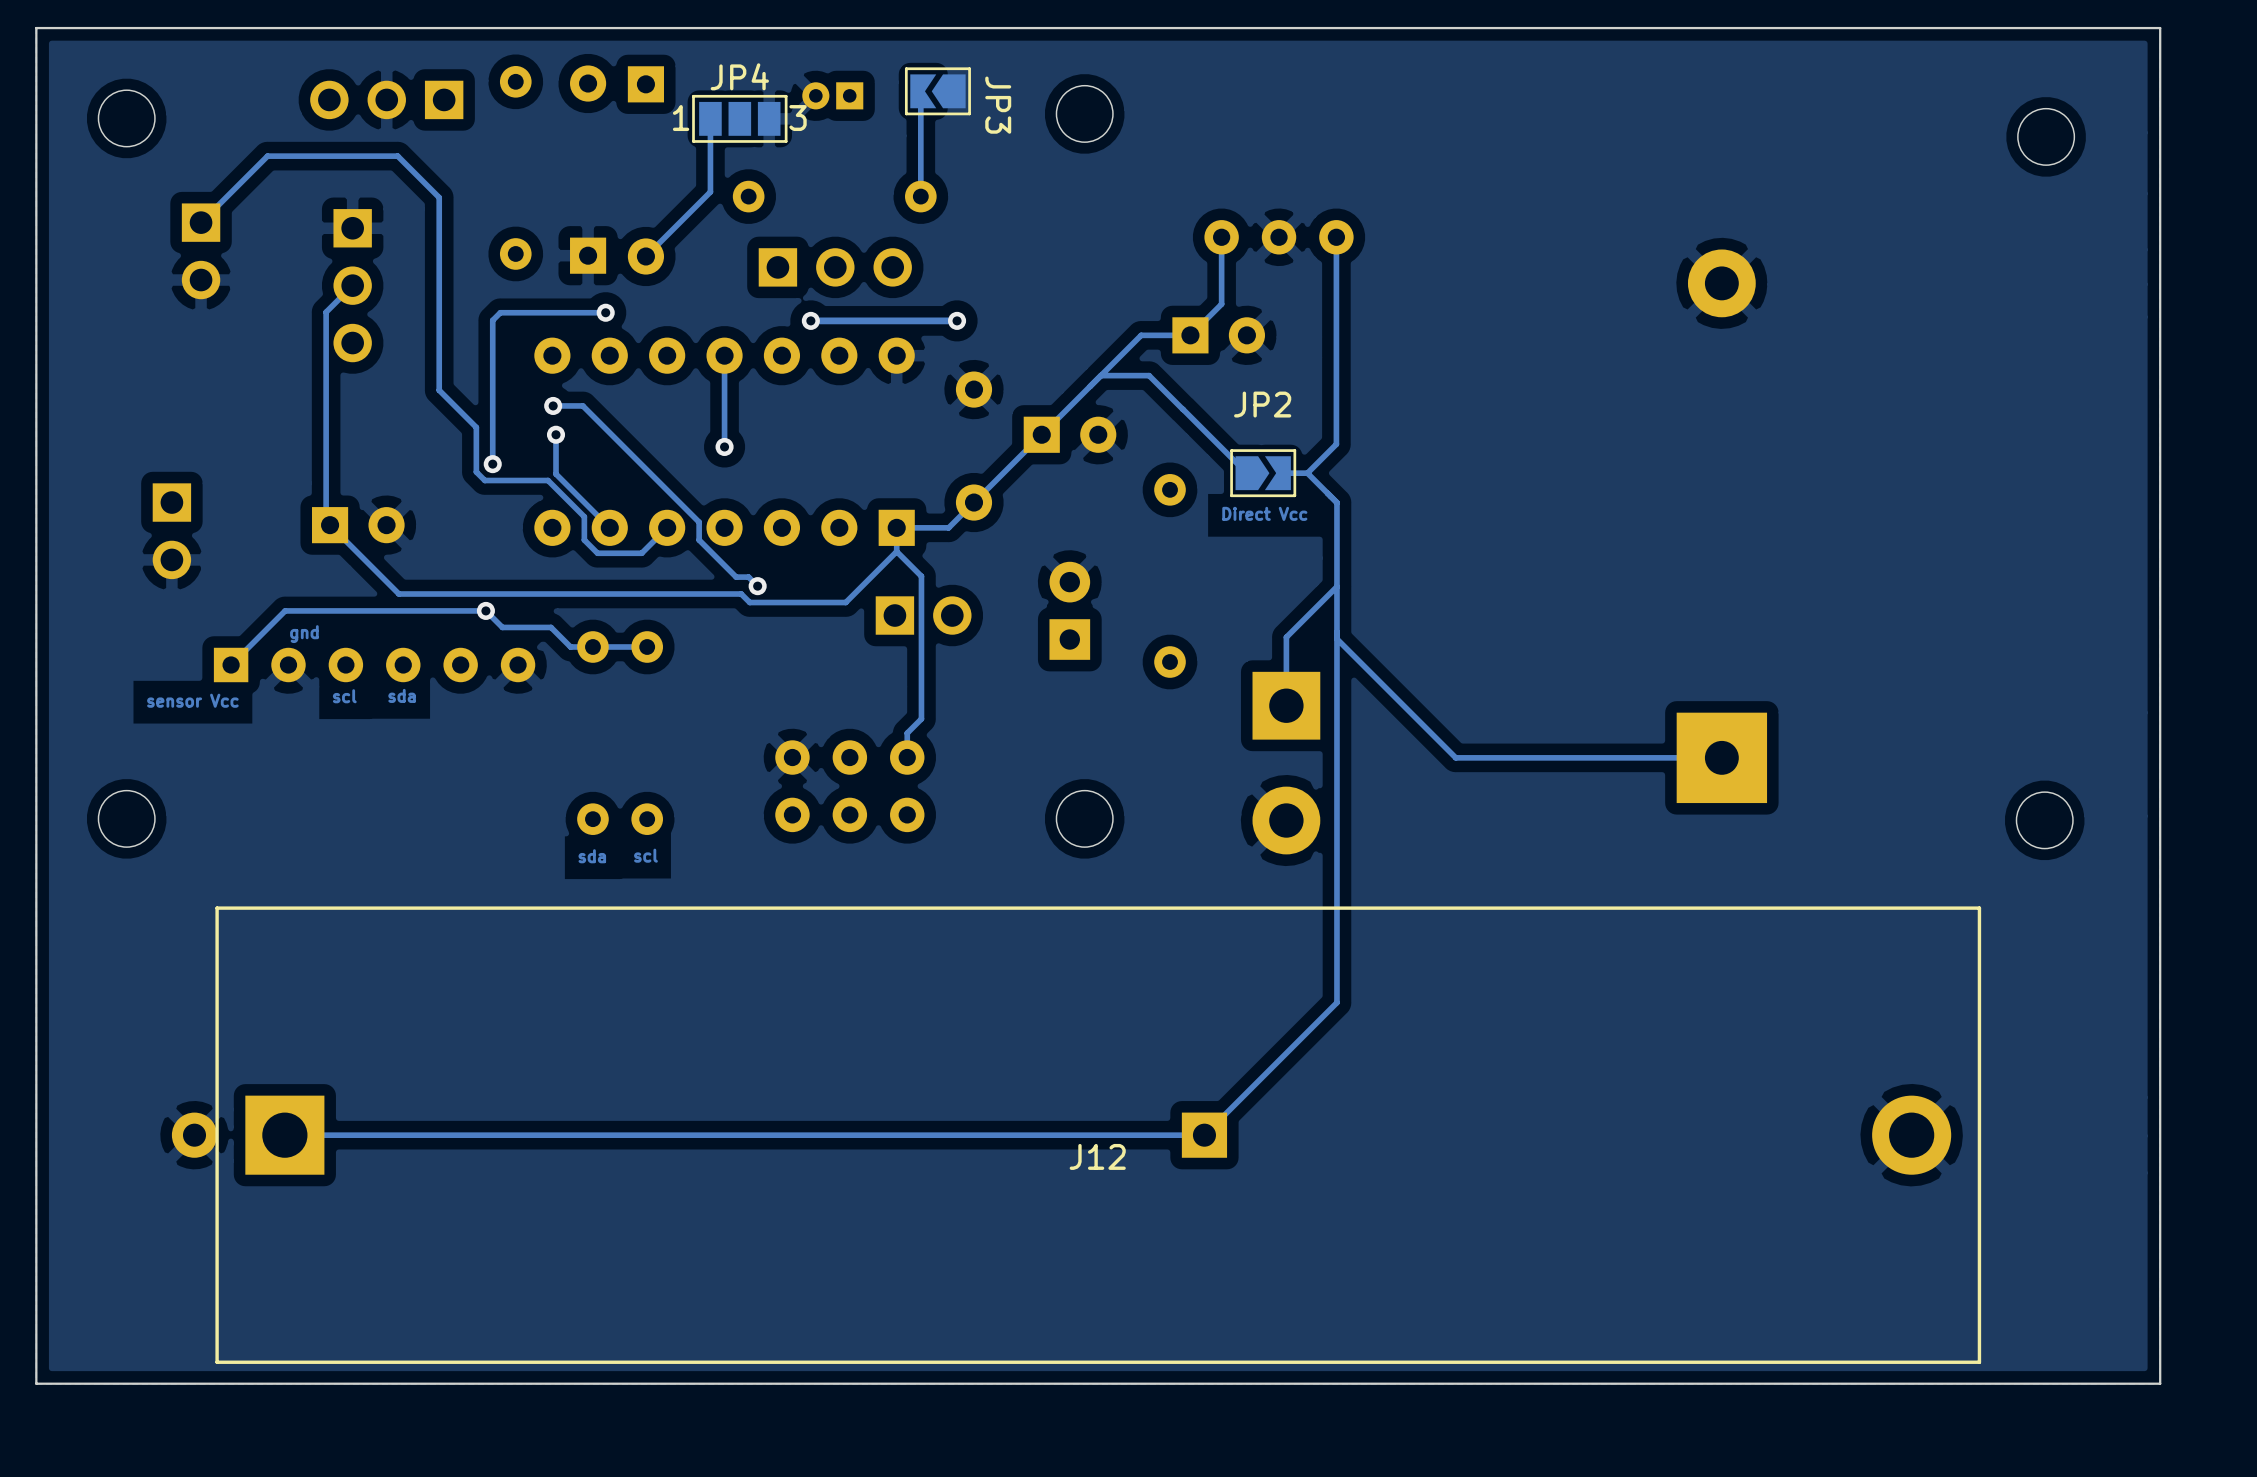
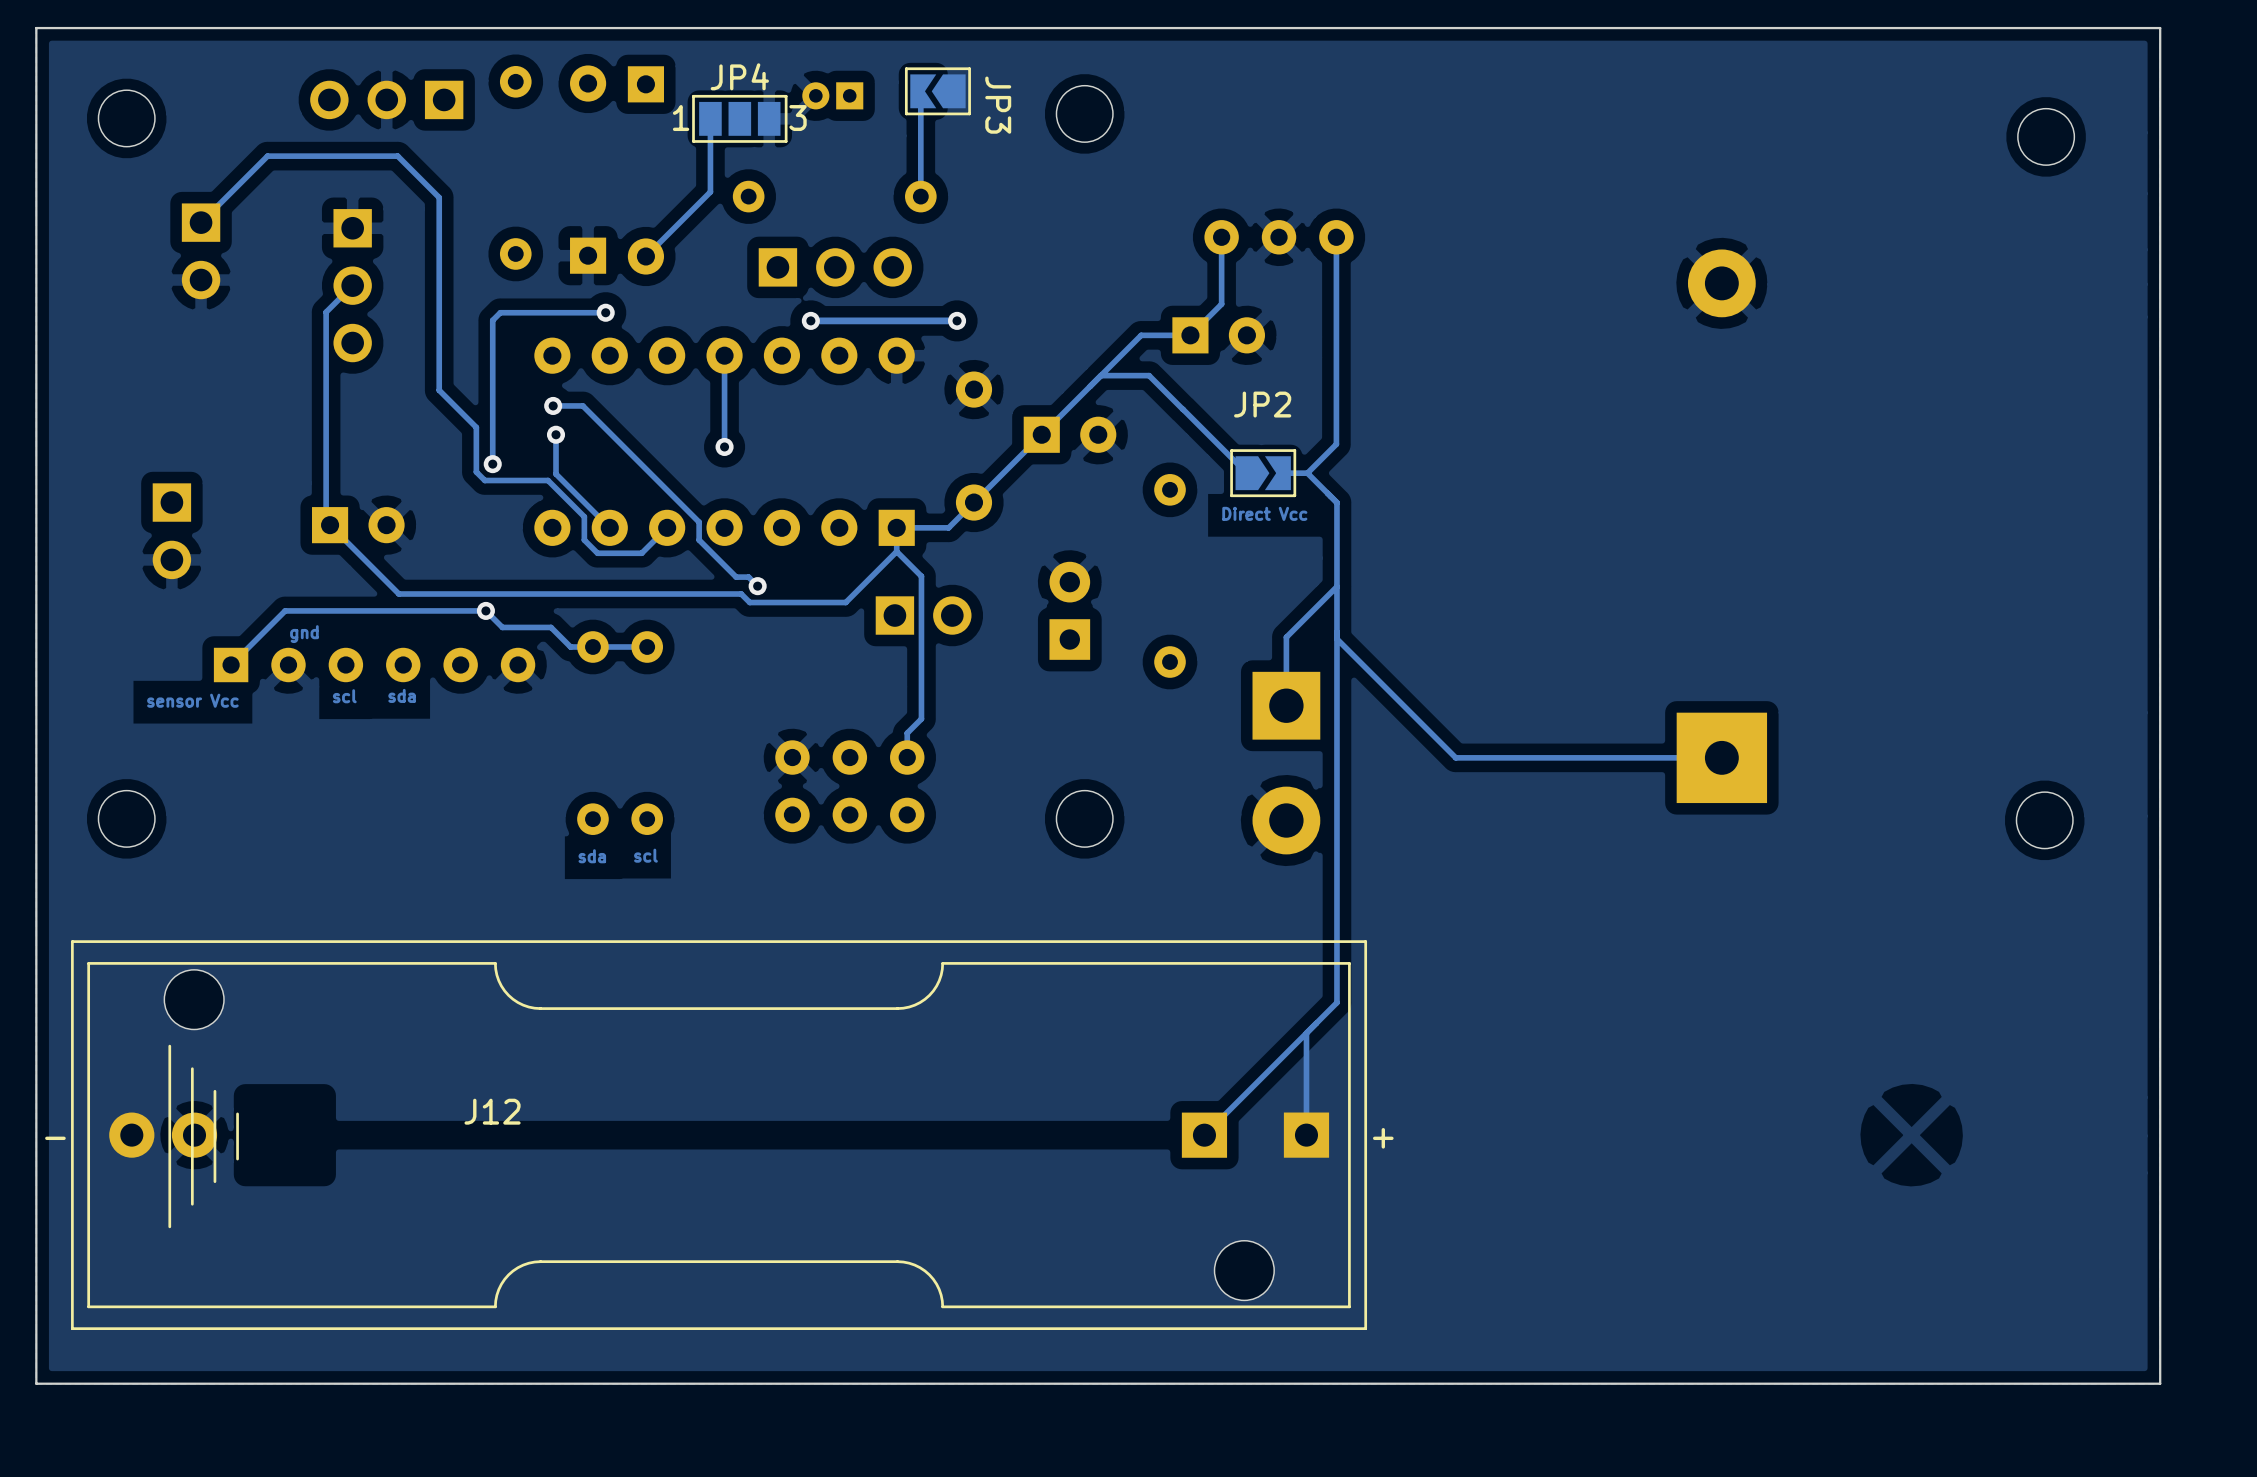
J12 footprint: [215, 906, 1982, 1364] -> [71, 940, 1368, 1331]
track: none -> (1306, 1033) (1306, 1135)
track: (1204, 1135) (284, 1135) -> none
J12 name position: J12 (1097, 1156) -> J12 (492, 1111)

